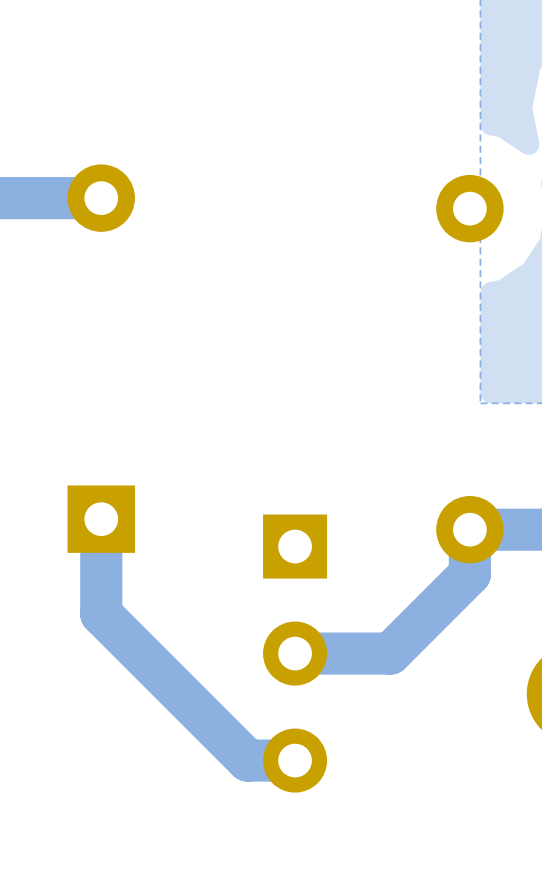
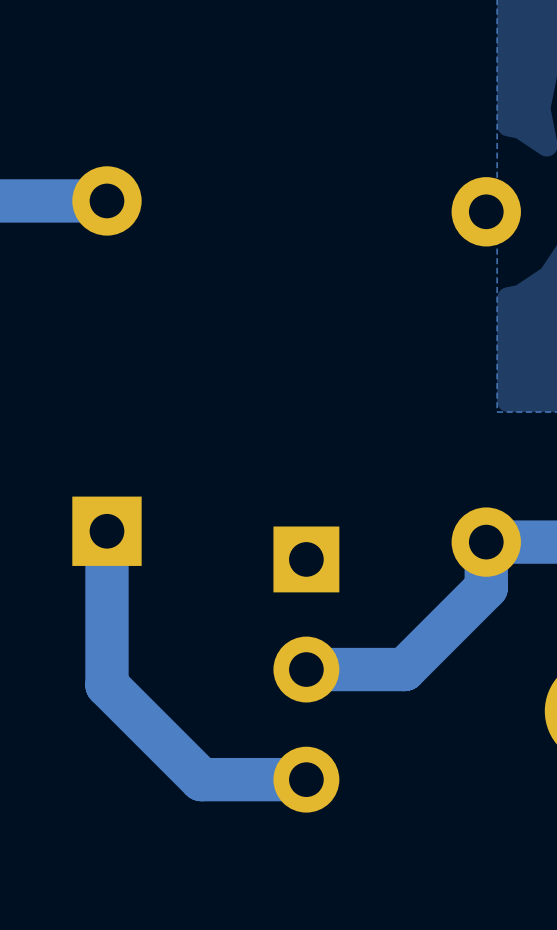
track: (101, 613) (247, 760) -> (106, 628) (106, 685) (201, 779) (257, 779)

